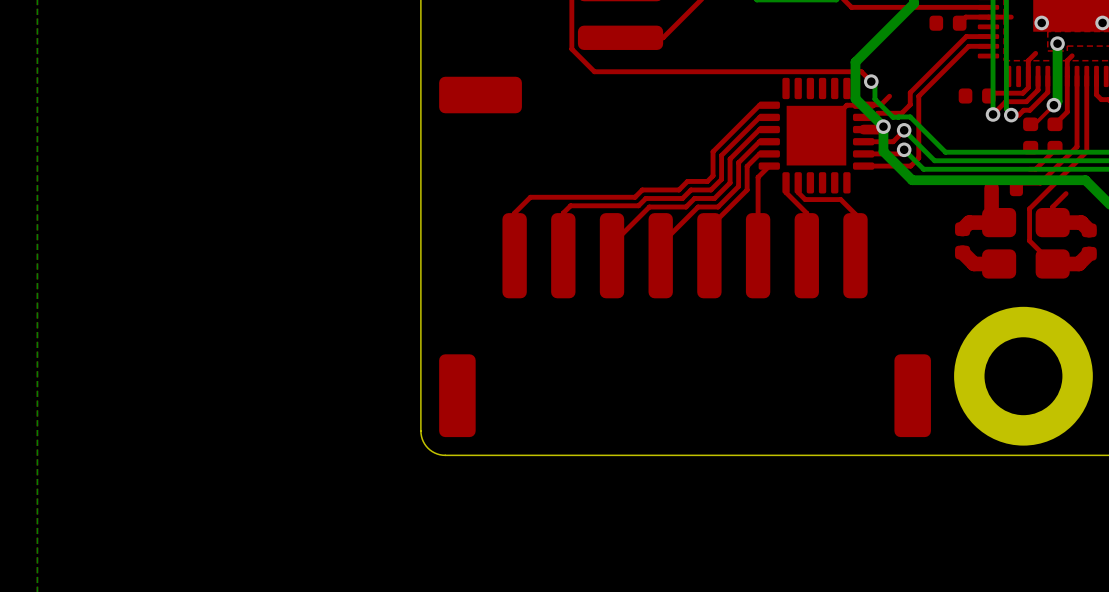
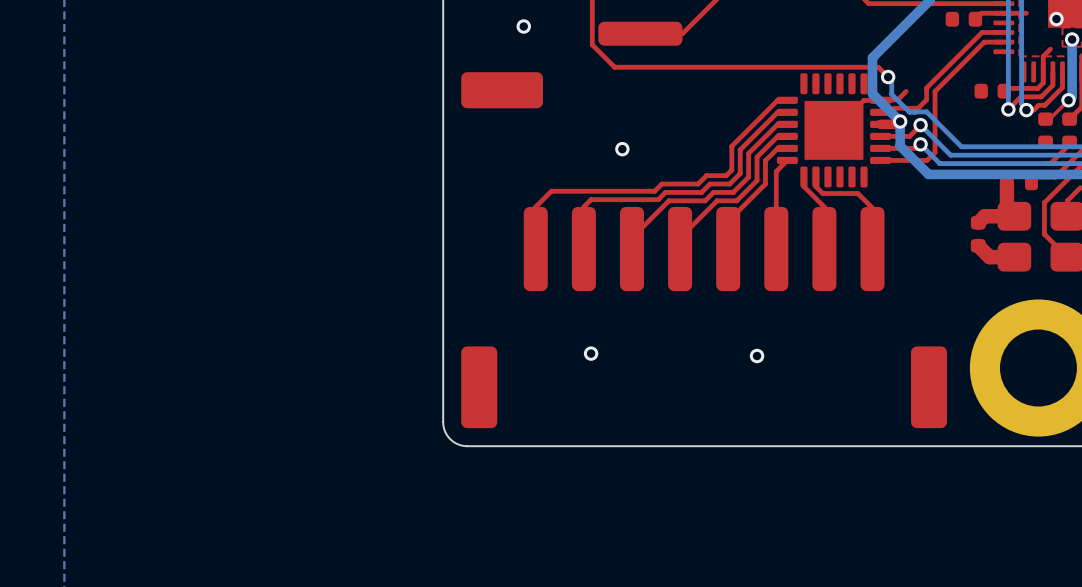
via: none -> (523, 26)
via: none -> (622, 149)
via: none -> (591, 353)
via: none -> (757, 356)

